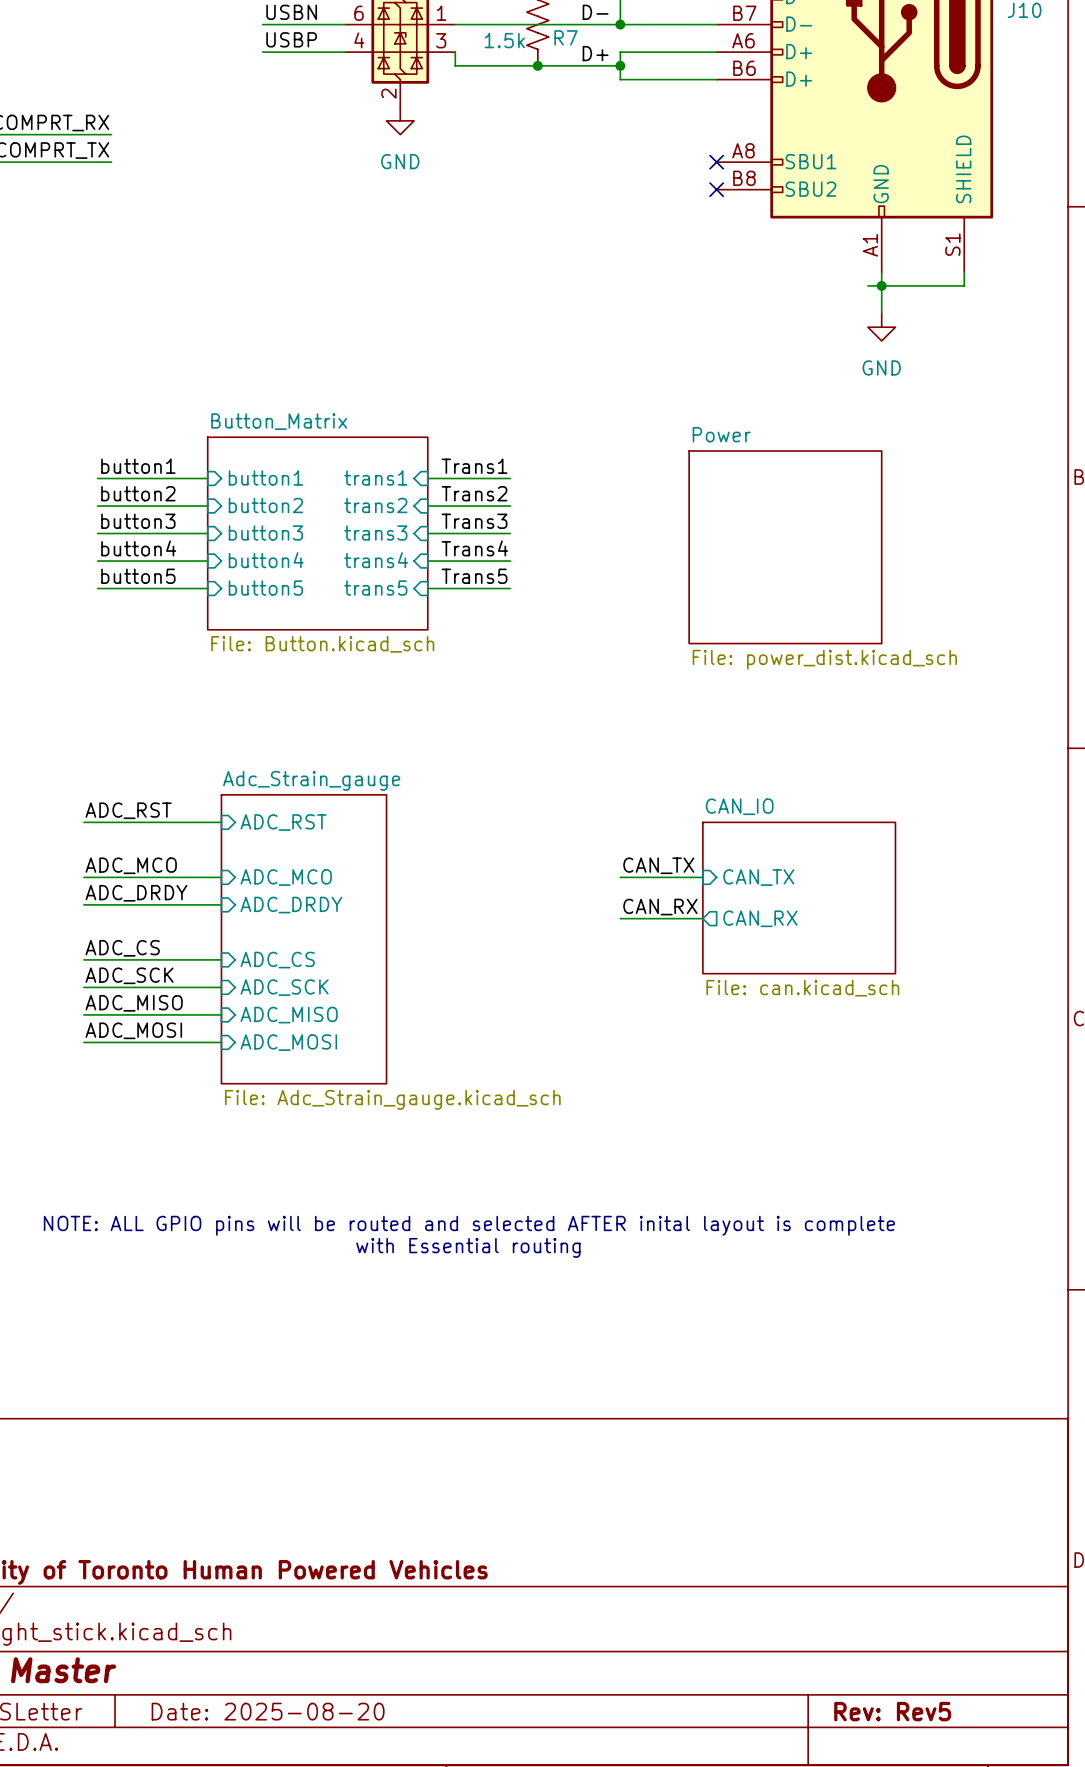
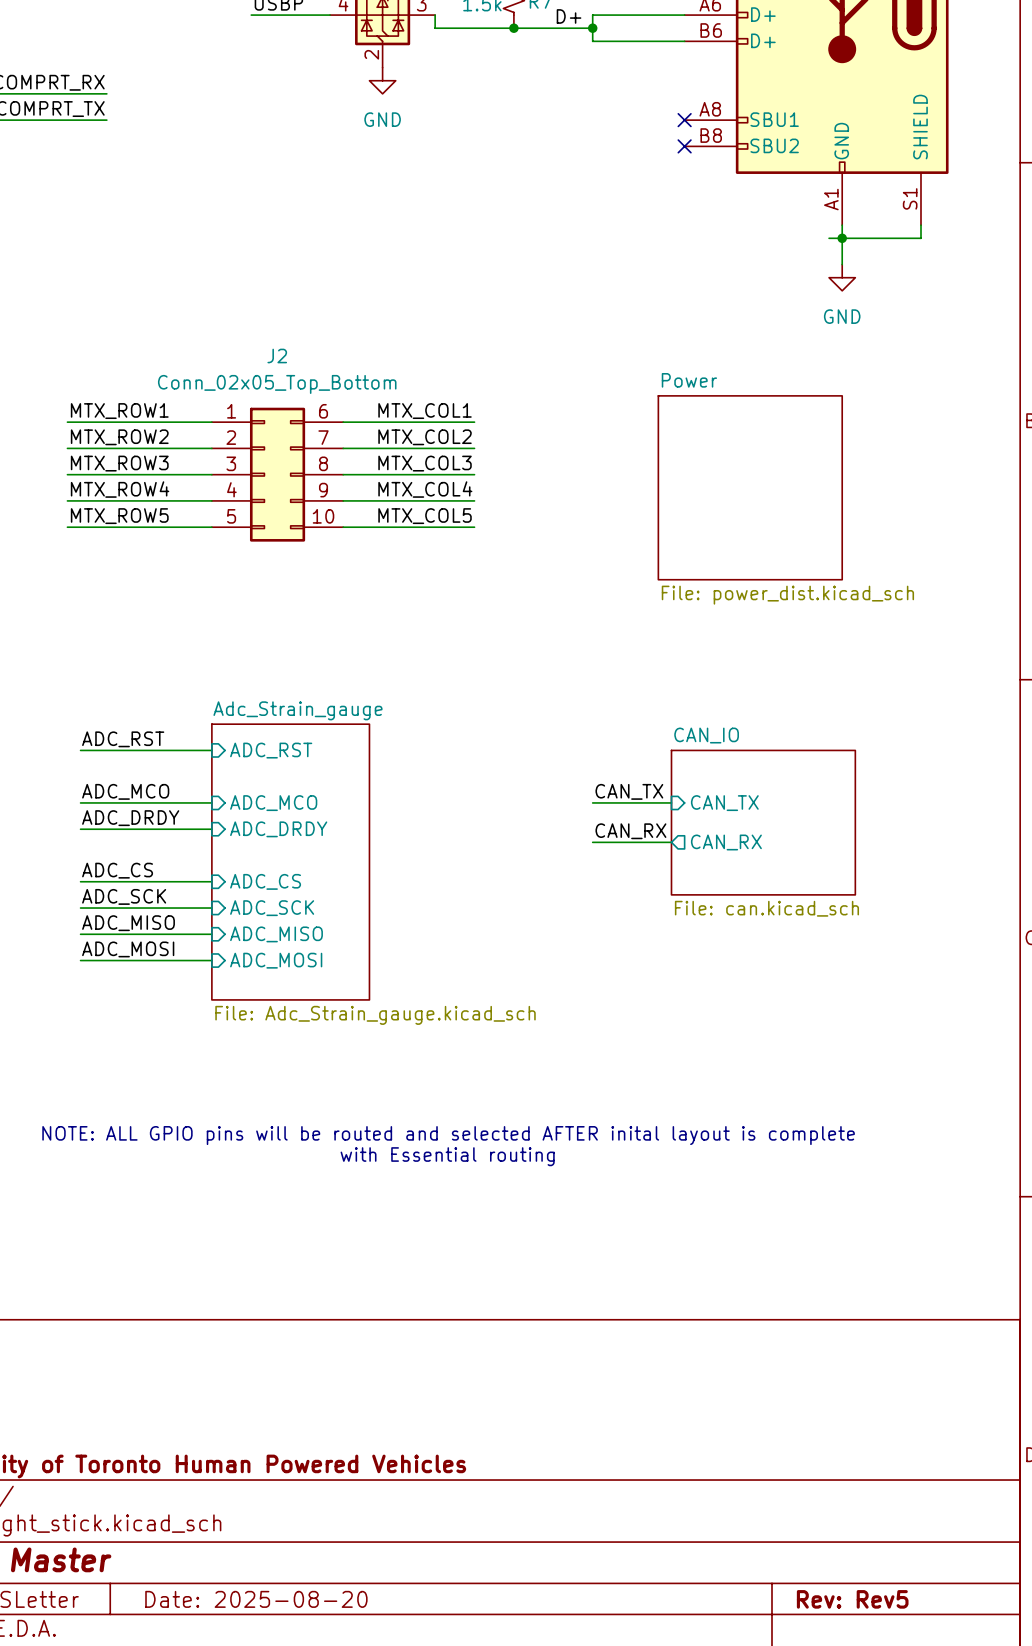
label: none -> MTX_ROW1 (119, 411)
label: button1 (138, 466) -> none
label: none -> MTX_COL1 (425, 411)
label: Trans1 (474, 466) -> none
sheet pin: button1 (265, 477) -> none
sheet pin: trans1 (375, 477) -> none
wire: none -> (67, 422) (93, 422)
wire: none -> (198, 422) (211, 422)
wire: none -> (343, 422) (408, 422)
wire: (496, 478) (510, 478) -> none
label: button2 (138, 493) -> none
label: Trans2 (474, 493) -> none
label: none -> MTX_ROW2 (119, 437)
label: none -> MTX_COL2 (425, 437)
sheet pin: button2 (265, 505) -> none
sheet pin: trans2 (375, 505) -> none
wire: none -> (67, 448) (93, 448)
wire: none -> (198, 448) (211, 448)
wire: none -> (343, 448) (408, 448)
wire: (496, 506) (510, 506) -> none
label: none -> MTX_ROW3 (119, 463)
label: button3 (138, 521) -> none
label: none -> MTX_COL3 (425, 463)
label: Trans3 (474, 521) -> none
wire: none -> (67, 474) (93, 474)
wire: none -> (198, 474) (211, 474)
sheet pin: button3 (265, 533) -> none
J2: none -> Conn_02x05_Top_Bottom (277, 474)
sheet Button_Matrix: File: Button.kicad_sch (317, 533) -> none
wire: none -> (343, 474) (408, 474)
sheet pin: trans3 (375, 533) -> none
wire: (496, 533) (510, 533) -> none
label: button4 (138, 548) -> none
label: Trans4 (474, 548) -> none
label: none -> MTX_ROW4 (120, 489)
label: none -> MTX_COL4 (425, 489)
sheet pin: button4 (266, 560) -> none
sheet pin: trans4 (376, 560) -> none
wire: none -> (67, 500) (93, 500)
wire: none -> (198, 500) (211, 500)
wire: none -> (343, 500) (408, 500)
wire: (496, 561) (510, 561) -> none
label: none -> MTX_ROW5 (119, 516)
label: button5 (138, 576) -> none
label: none -> MTX_COL5 (425, 516)
label: Trans5 (474, 576) -> none
wire: none -> (67, 527) (93, 527)
wire: none -> (198, 527) (211, 527)
sheet pin: button5 (265, 588) -> none
wire: none -> (343, 527) (408, 527)
sheet pin: trans5 (375, 588) -> none
wire: (496, 588) (510, 588) -> none

